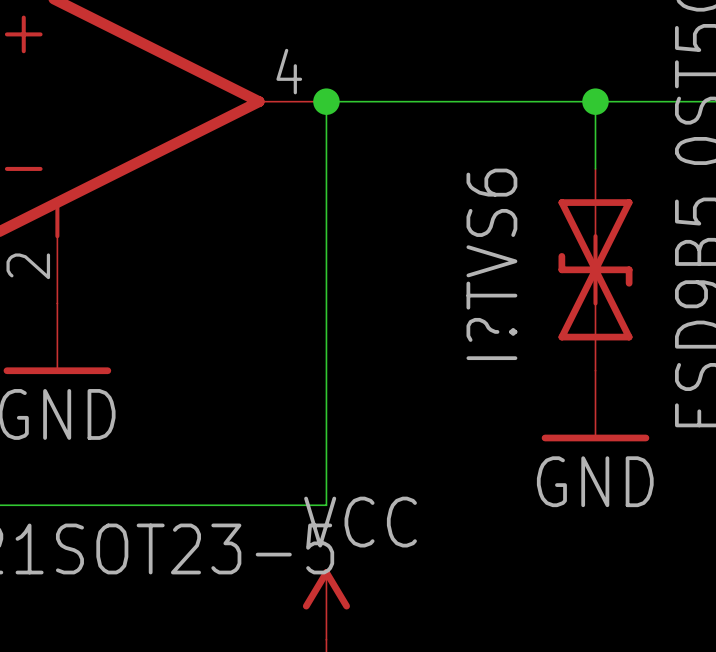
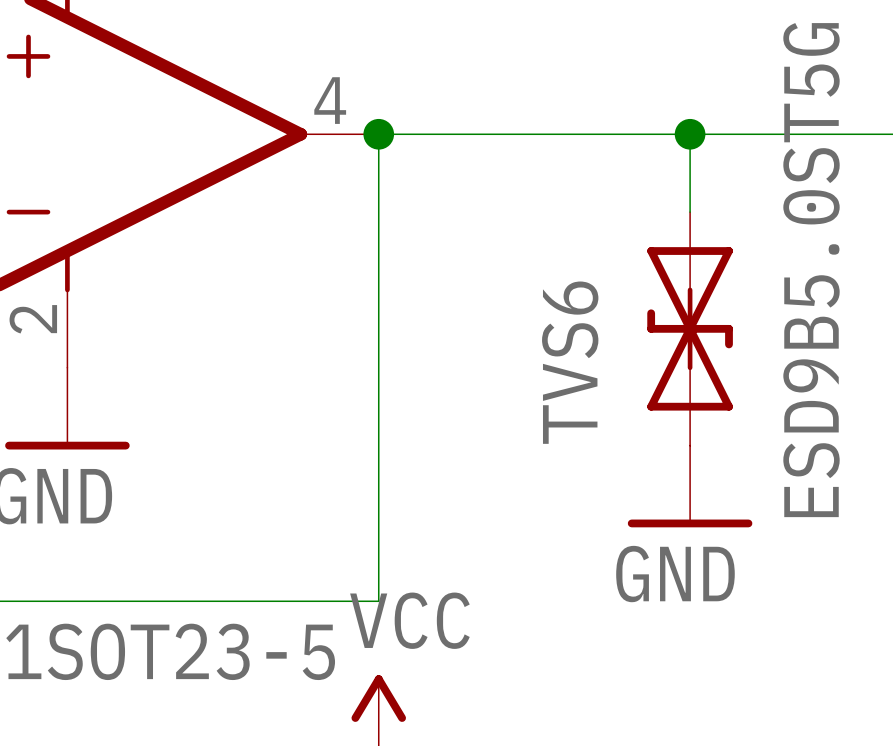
I?TVS6 name: I?TVS6 (491, 264) -> TVS6 (570, 362)

